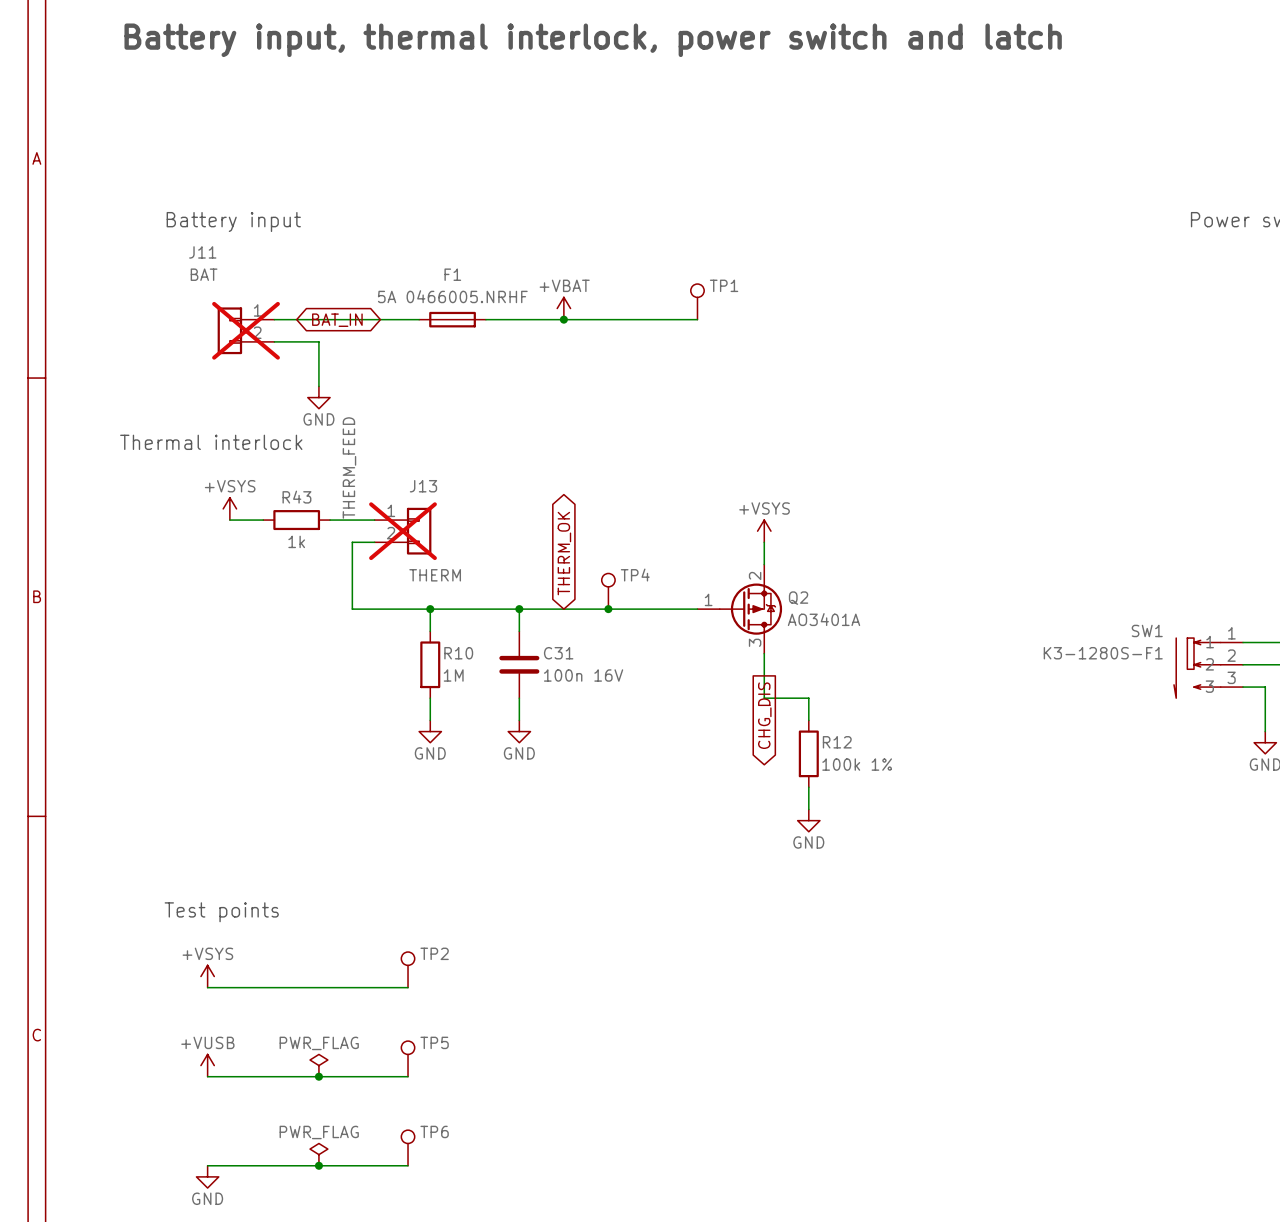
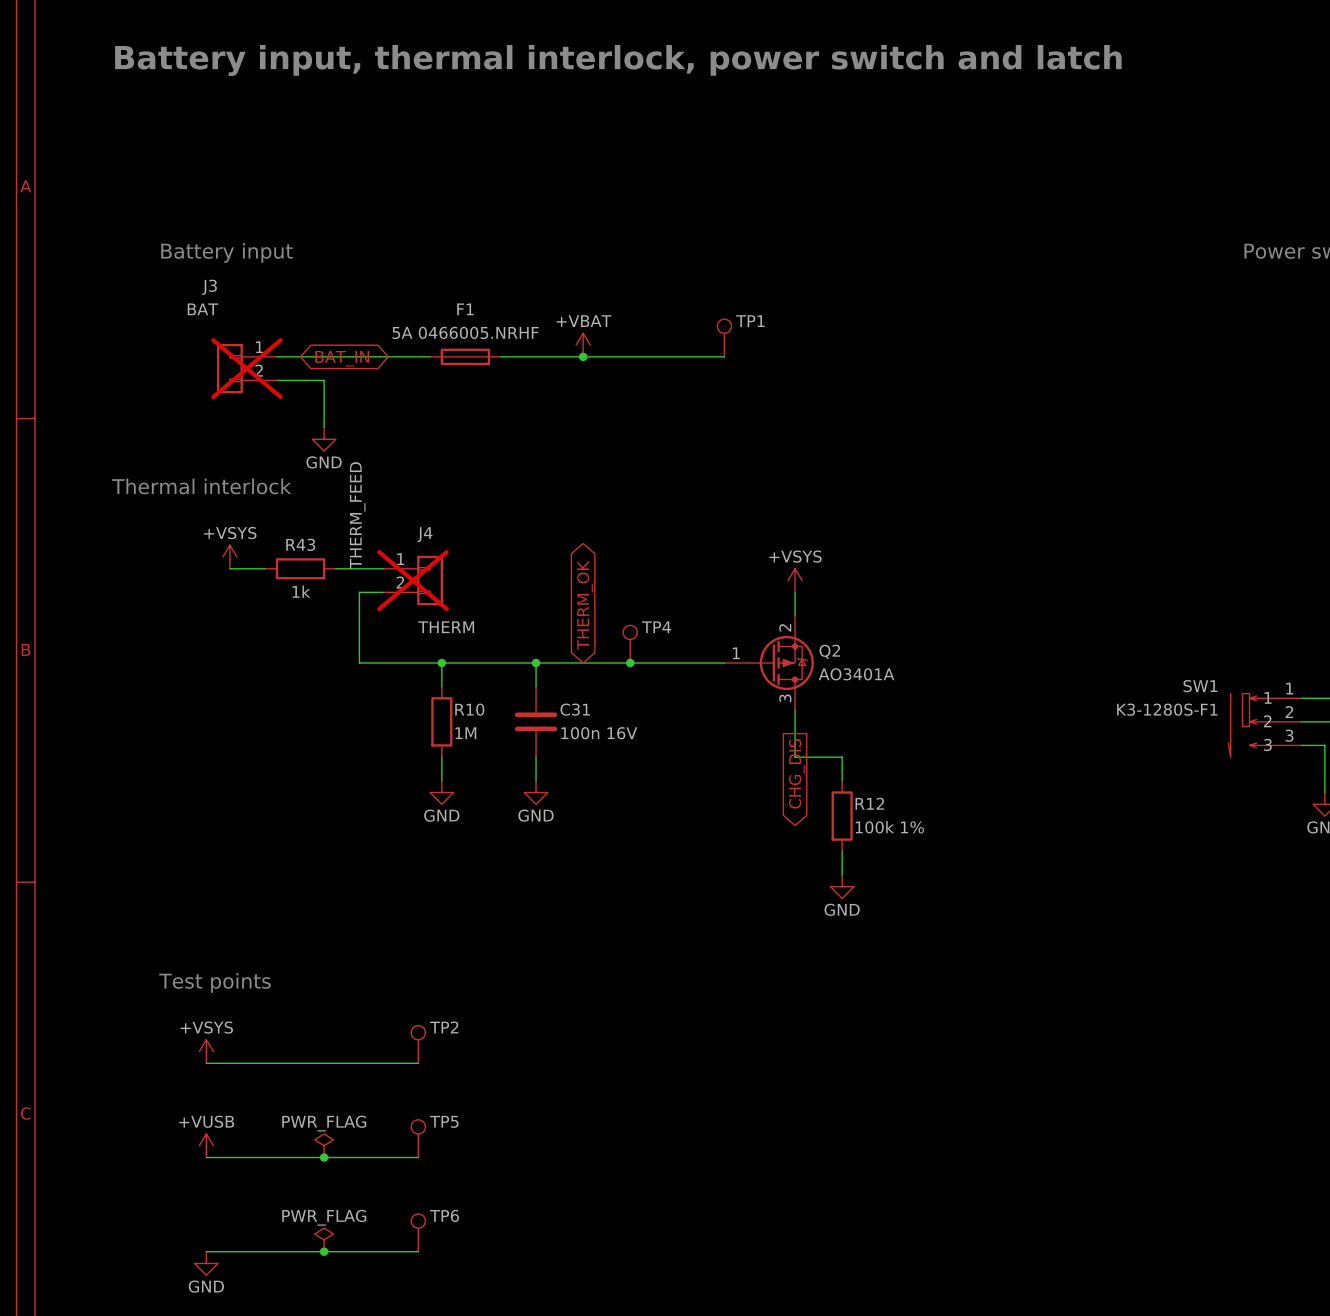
J11 name: J11 (202, 252) -> J3 (209, 287)
J13 name: J13 (423, 486) -> J4 (424, 534)

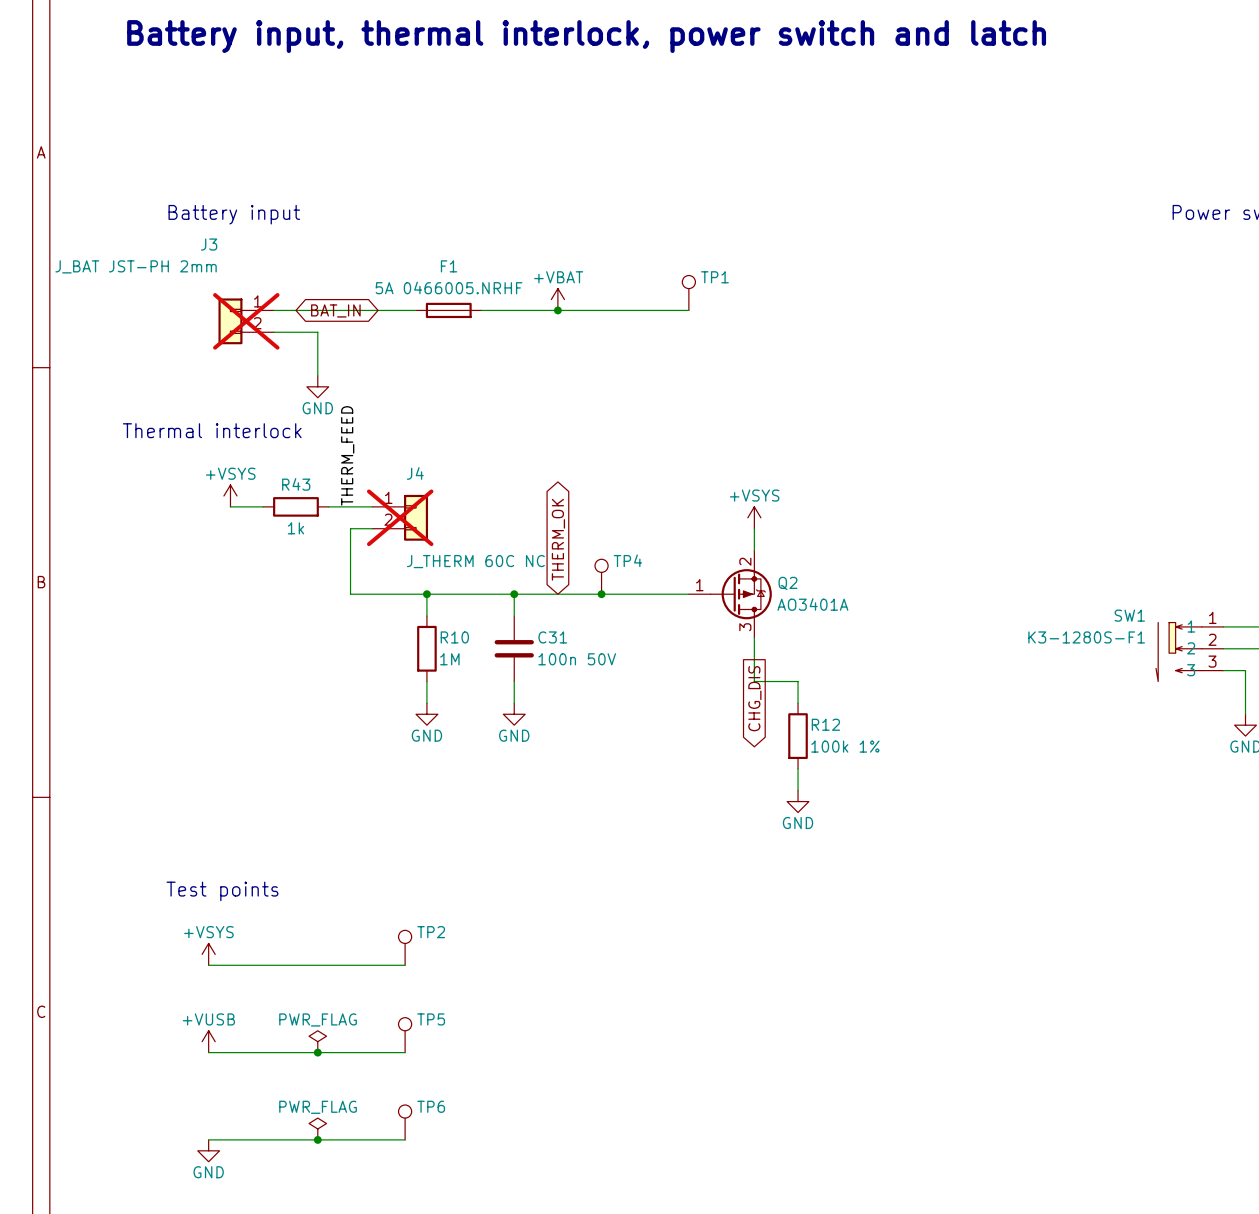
J3 value: BAT (202, 309) -> J_BAT JST-PH 2mm (136, 266)
J4 value: THERM (446, 627) -> J_THERM 60C NC (475, 561)
C31 value: 100n 16V (599, 733) -> 100n 50V (577, 659)

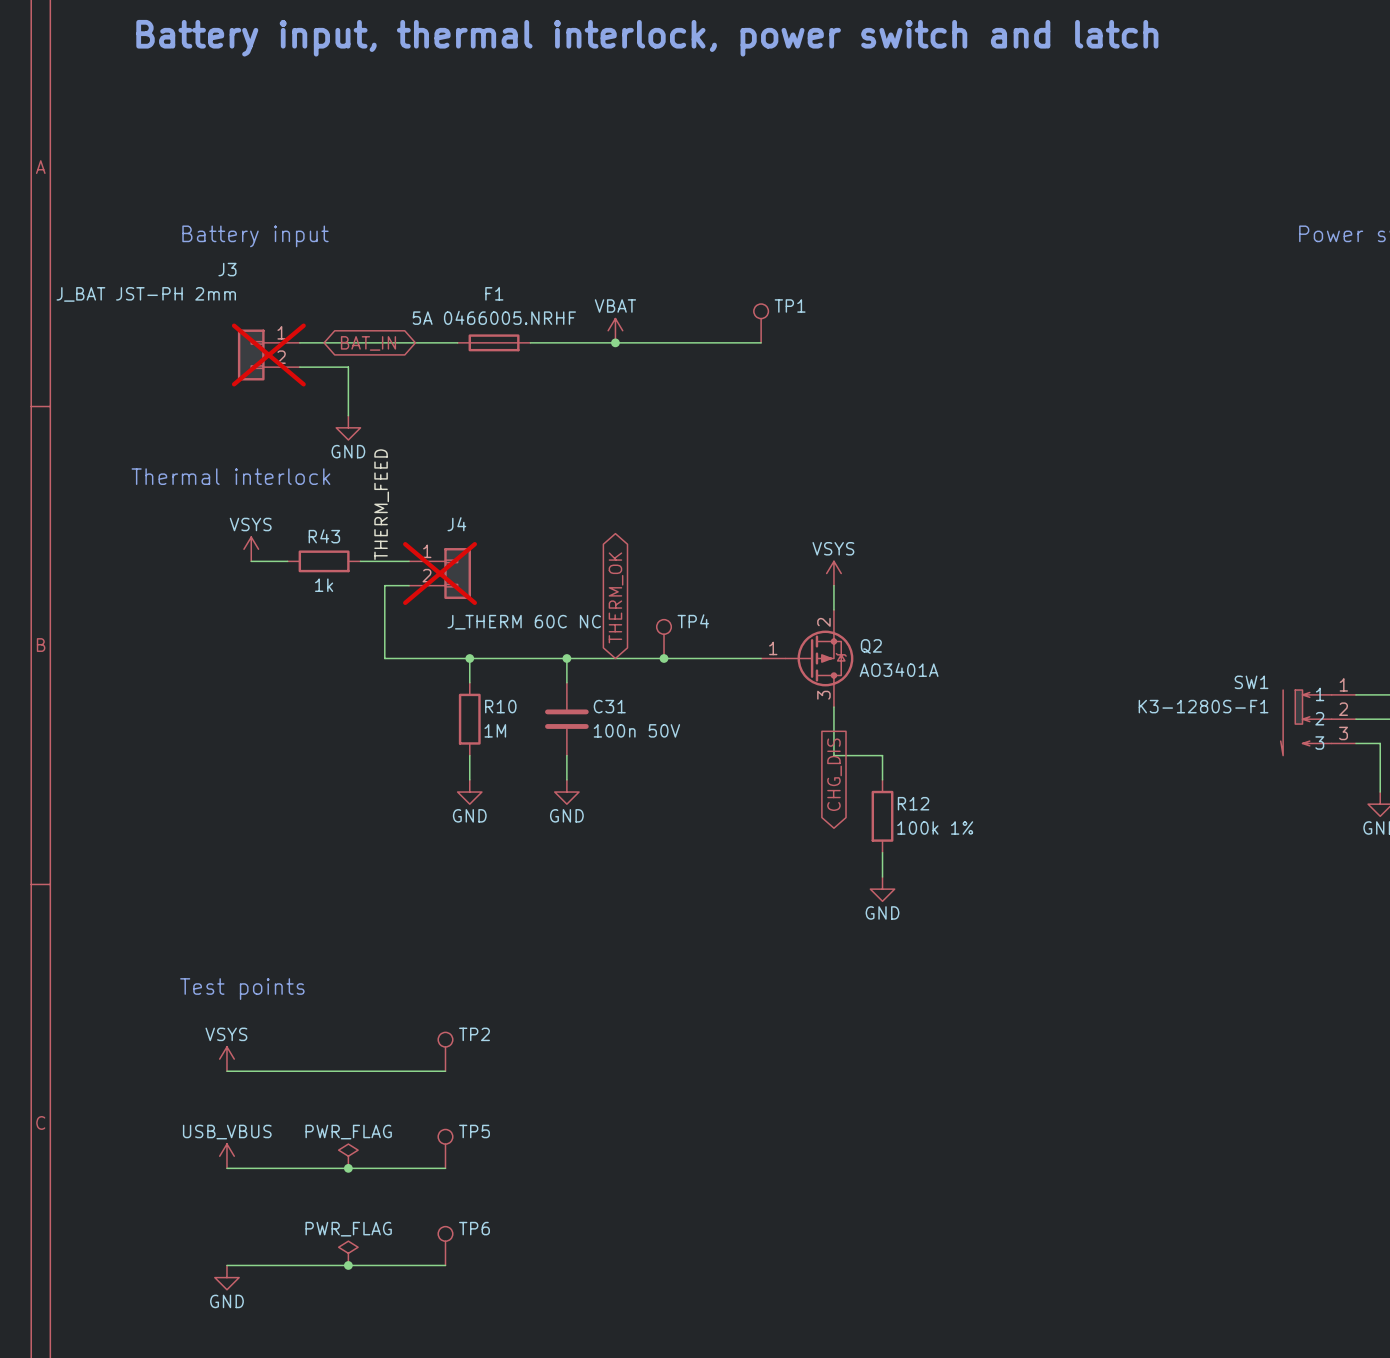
power symbol: +VBAT (557, 299) -> VBAT (615, 330)
power symbol: +VSYS (230, 495) -> VSYS (251, 549)
power symbol: +VSYS (754, 517) -> VSYS (833, 573)
power symbol: +VSYS (208, 954) -> VSYS (226, 1059)
power symbol: +VUSB (208, 1041) -> USB_VBUS (226, 1156)

